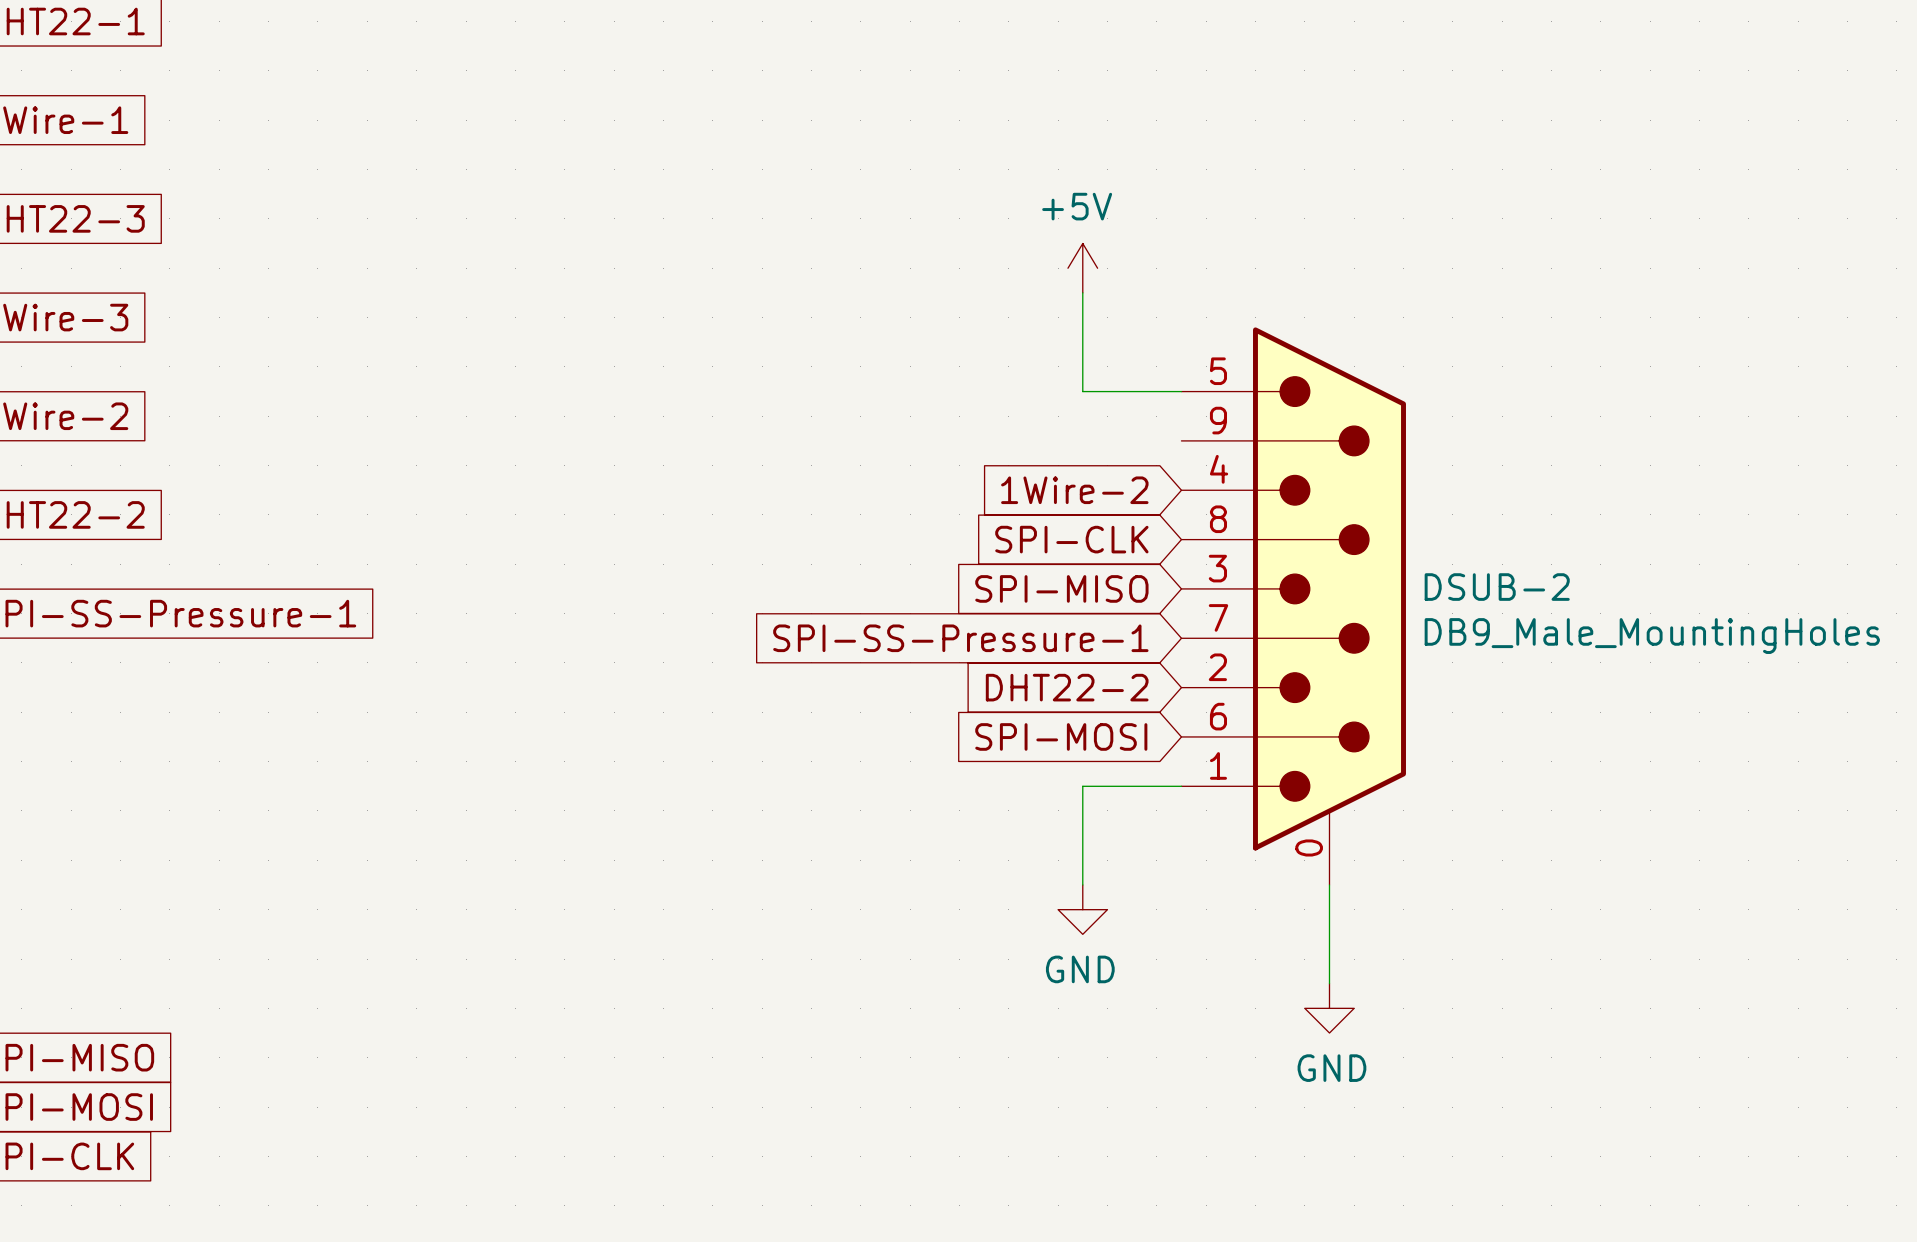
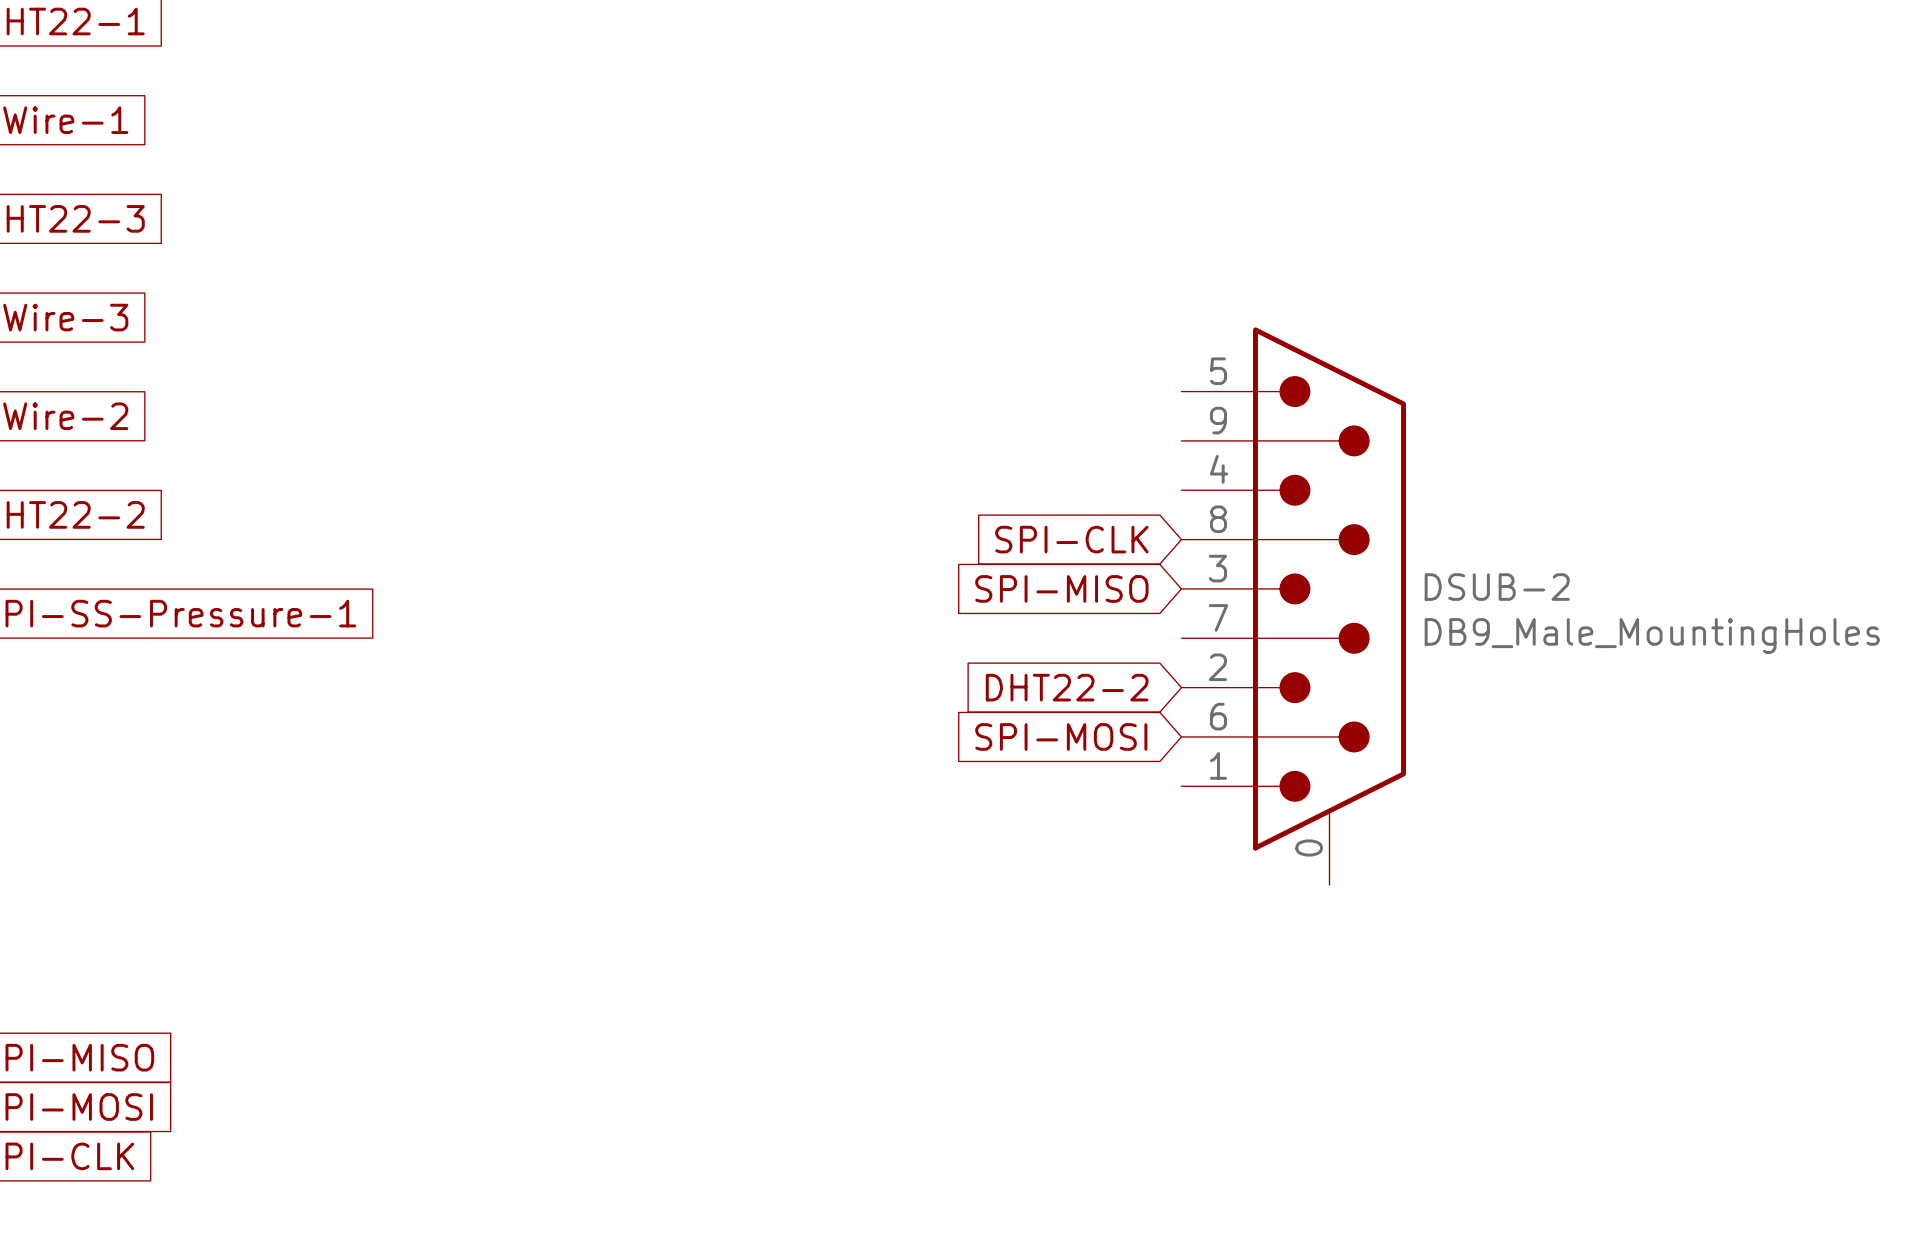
power symbol: +5V (1082, 268) -> none
wire: (1082, 292) (1082, 391) (1181, 391) -> none
global label: 1Wire-2 (1074, 490) -> none
global label: SPI-SS-Pressure-1 (960, 638) -> none
wire: (1181, 786) (1082, 786) (1082, 884) -> none
wire: (1329, 884) (1329, 983) -> none
power symbol: GND (1082, 909) -> none
power symbol: GND (1329, 1008) -> none

